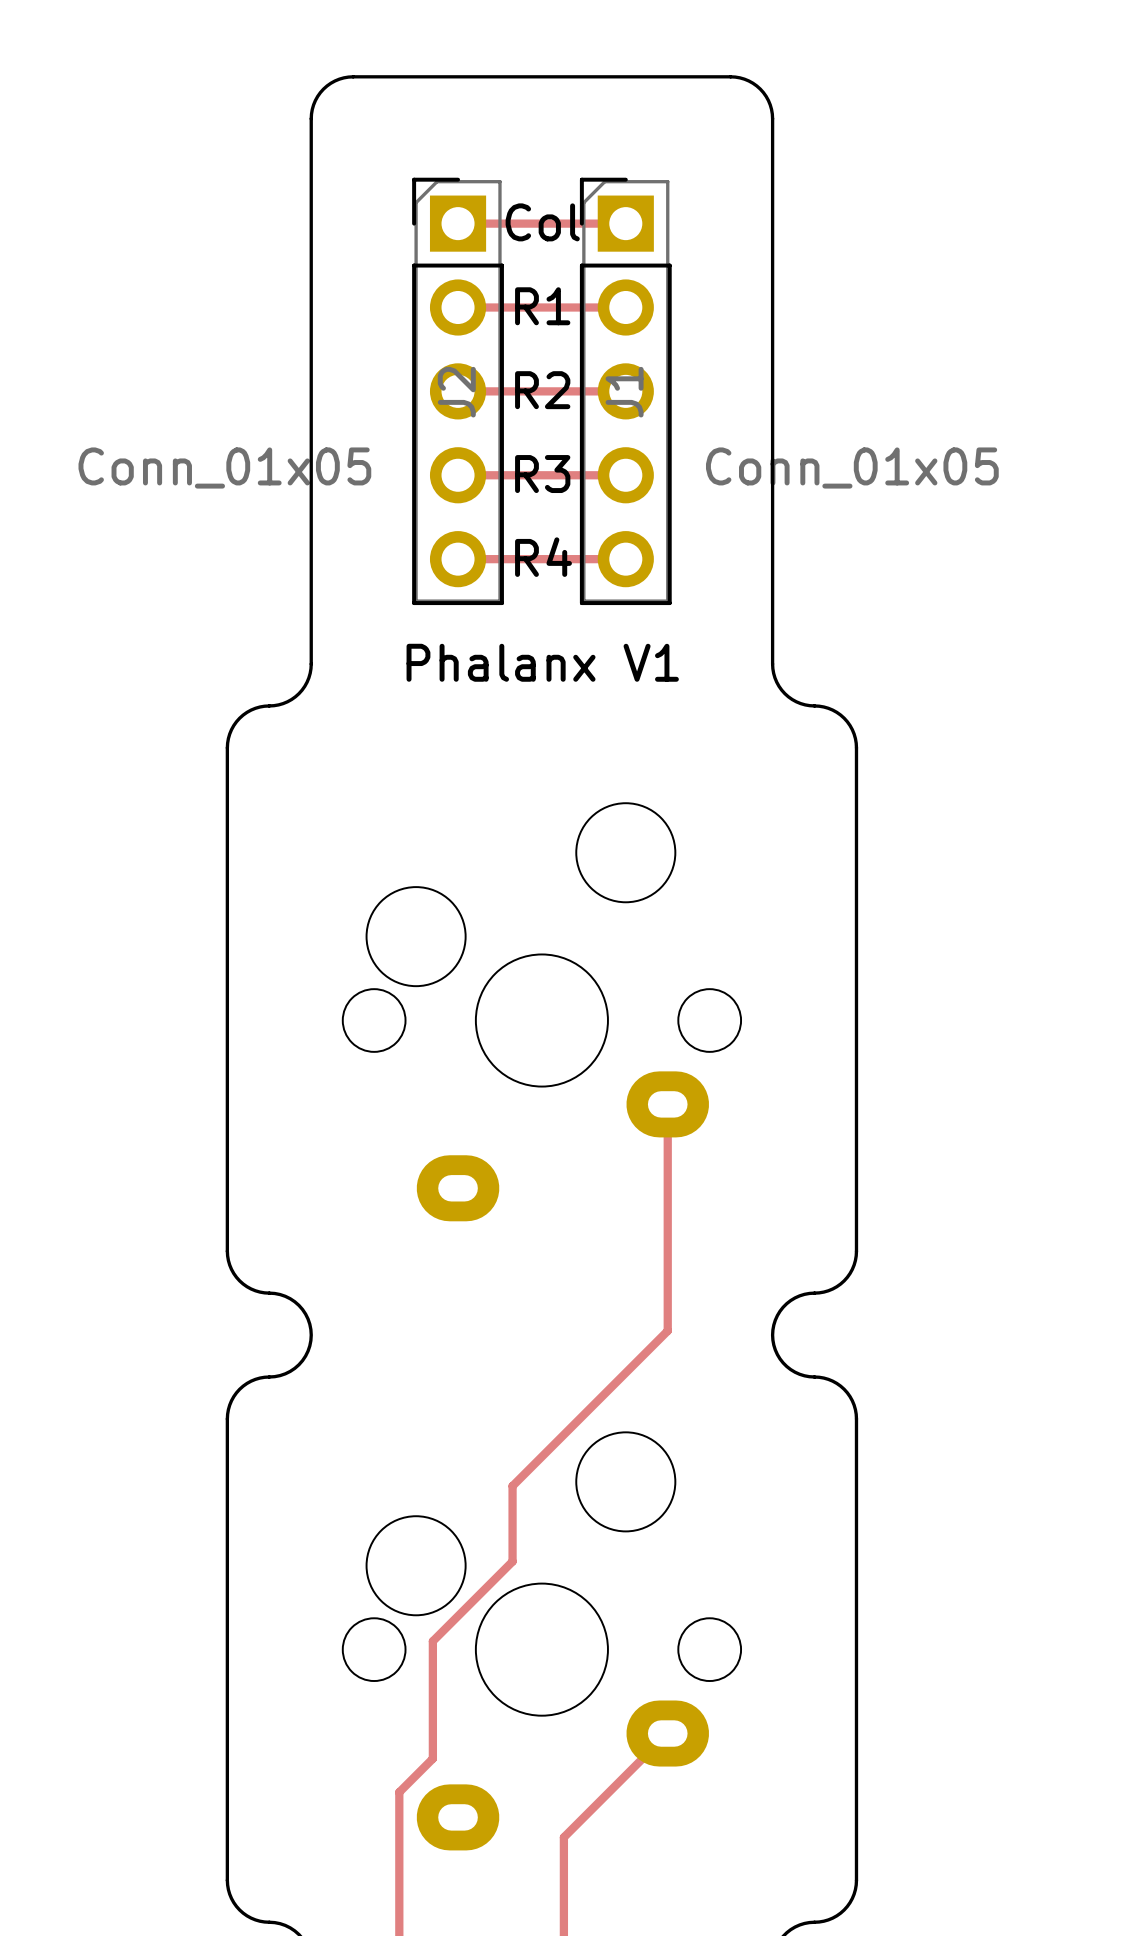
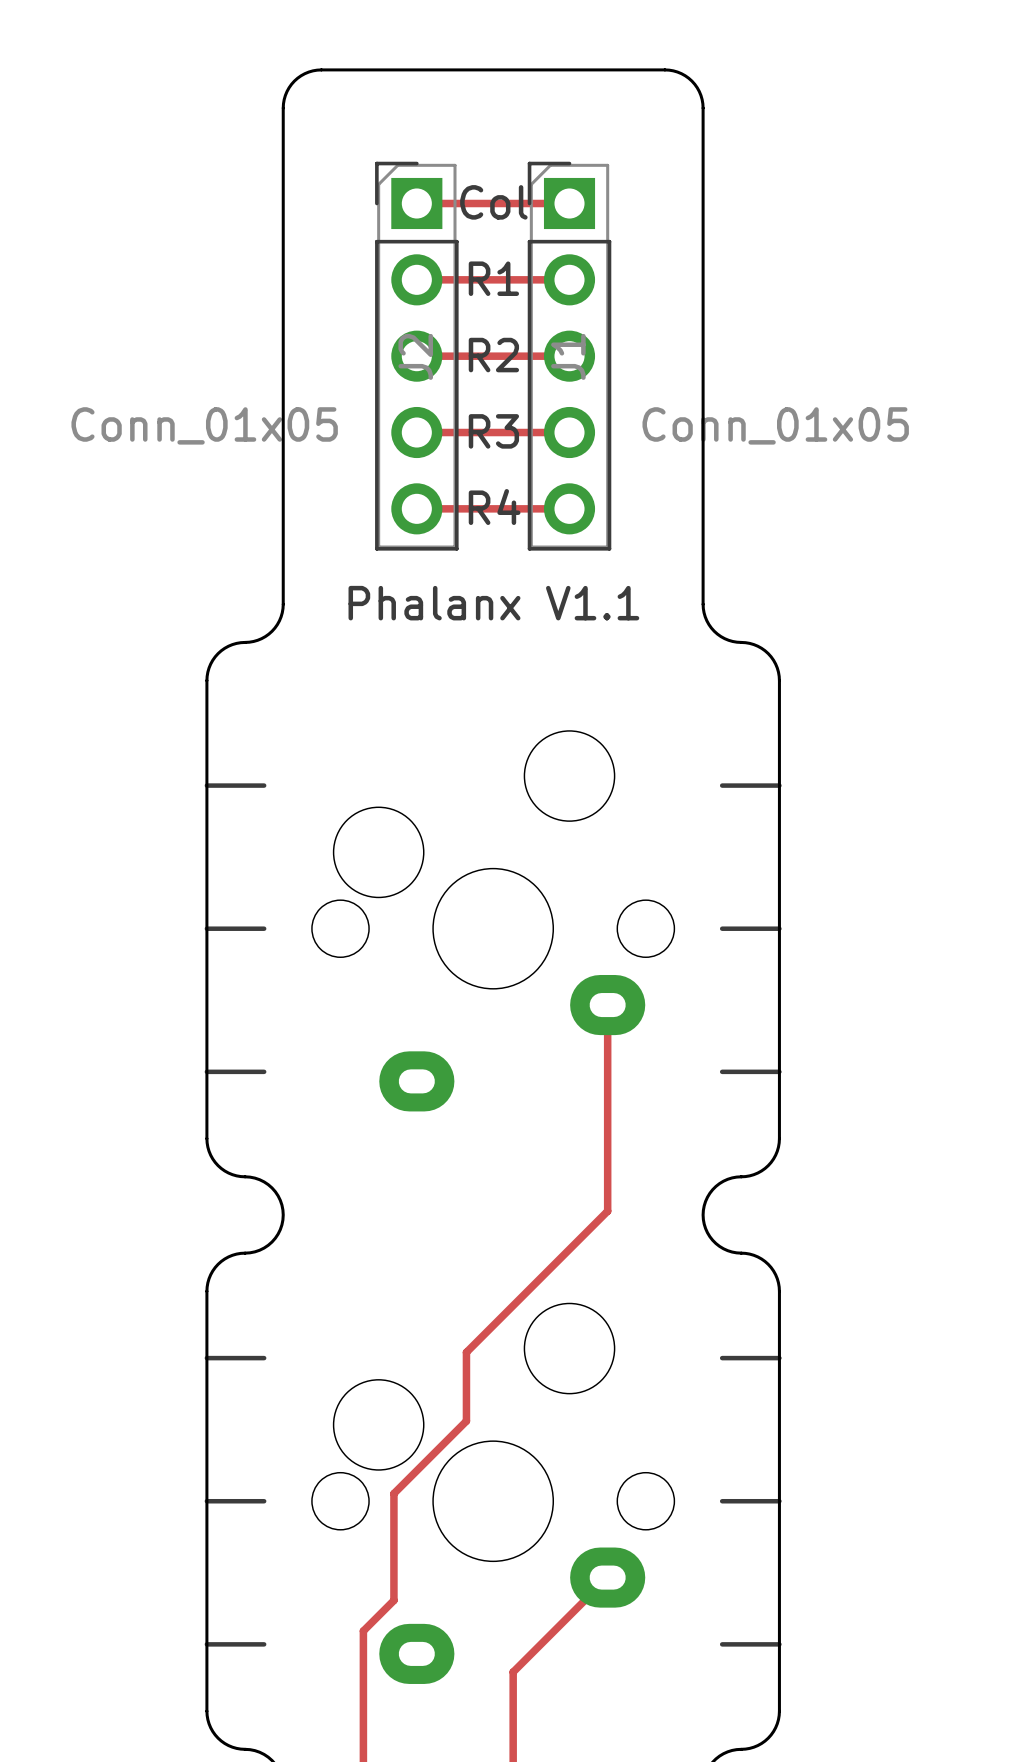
text: Phalanx V1 (542, 662) -> Phalanx V1.1 (493, 603)
line: none -> (206, 785) (264, 785)
line: none -> (722, 785) (779, 785)
line: none -> (206, 928) (264, 928)
line: none -> (722, 928) (779, 928)
line: none -> (206, 1071) (264, 1071)
line: none -> (722, 1071) (779, 1071)
line: none -> (206, 1358) (264, 1358)
line: none -> (722, 1358) (779, 1358)
line: none -> (206, 1501) (264, 1501)
line: none -> (722, 1501) (779, 1501)
line: none -> (206, 1644) (264, 1644)
line: none -> (722, 1644) (779, 1644)

